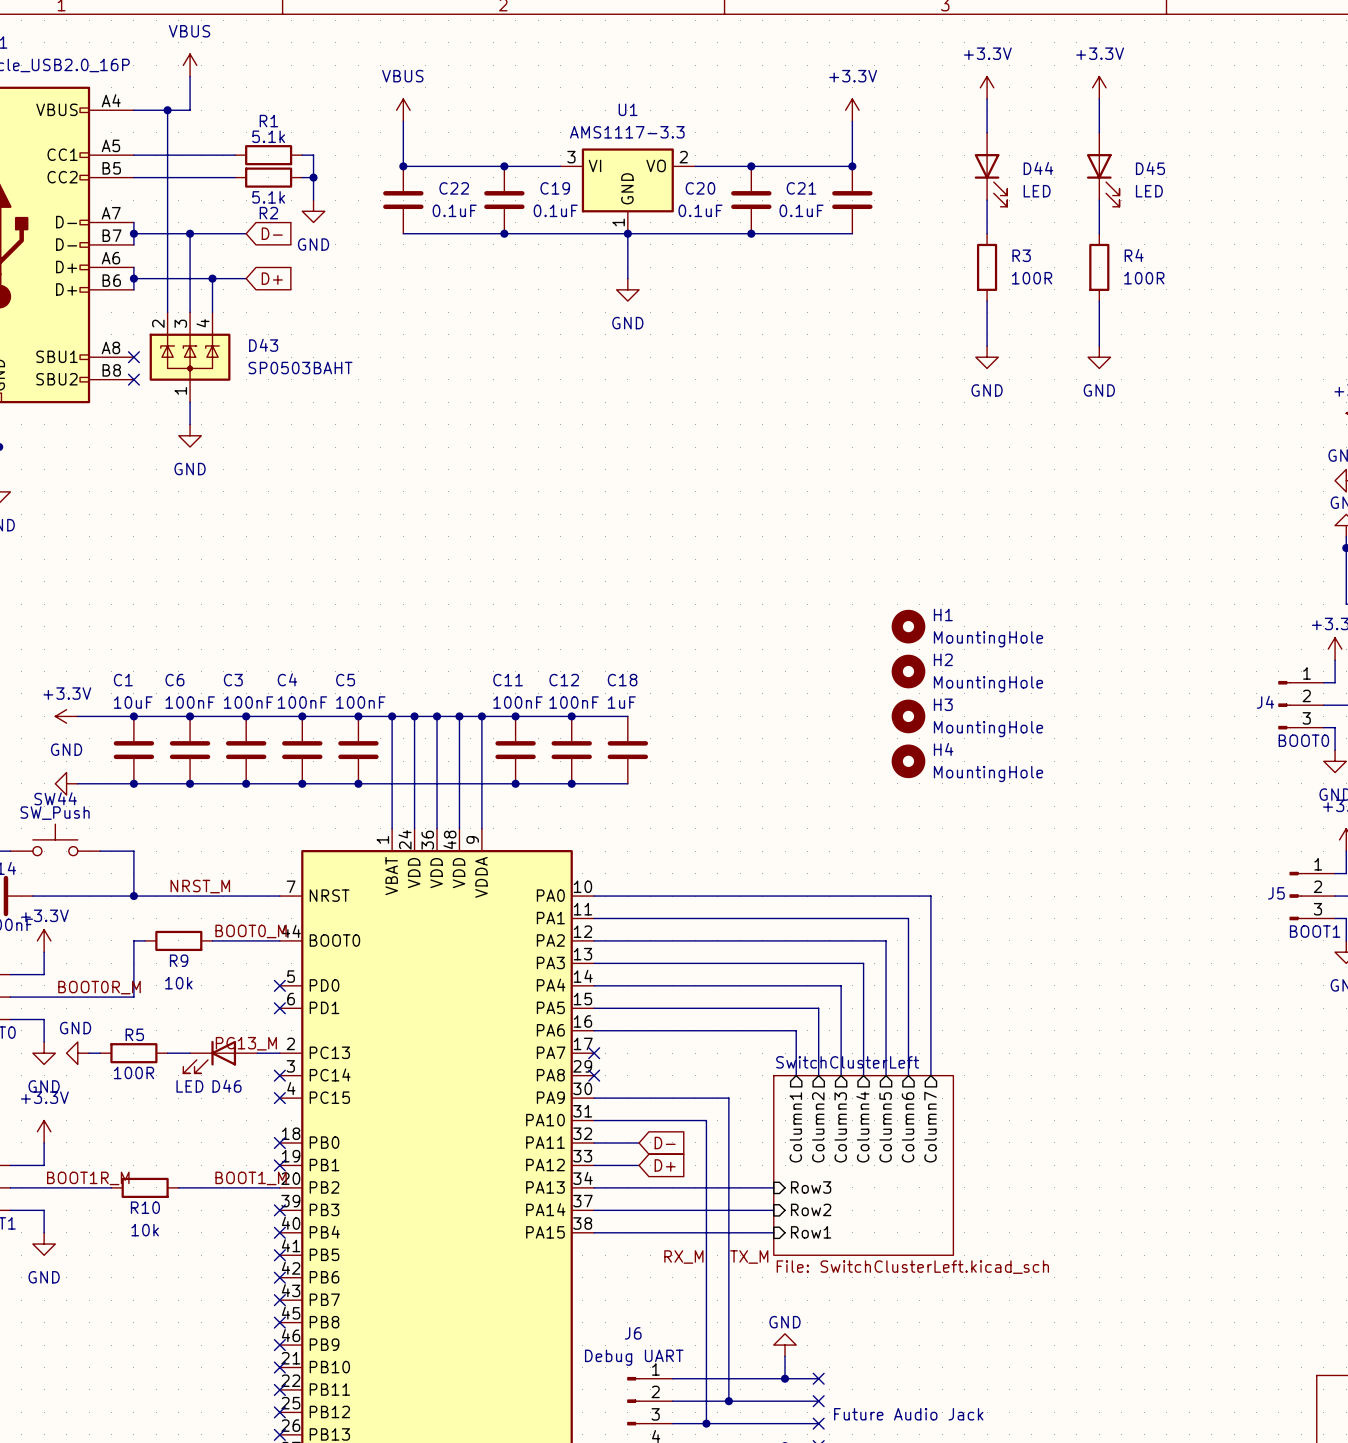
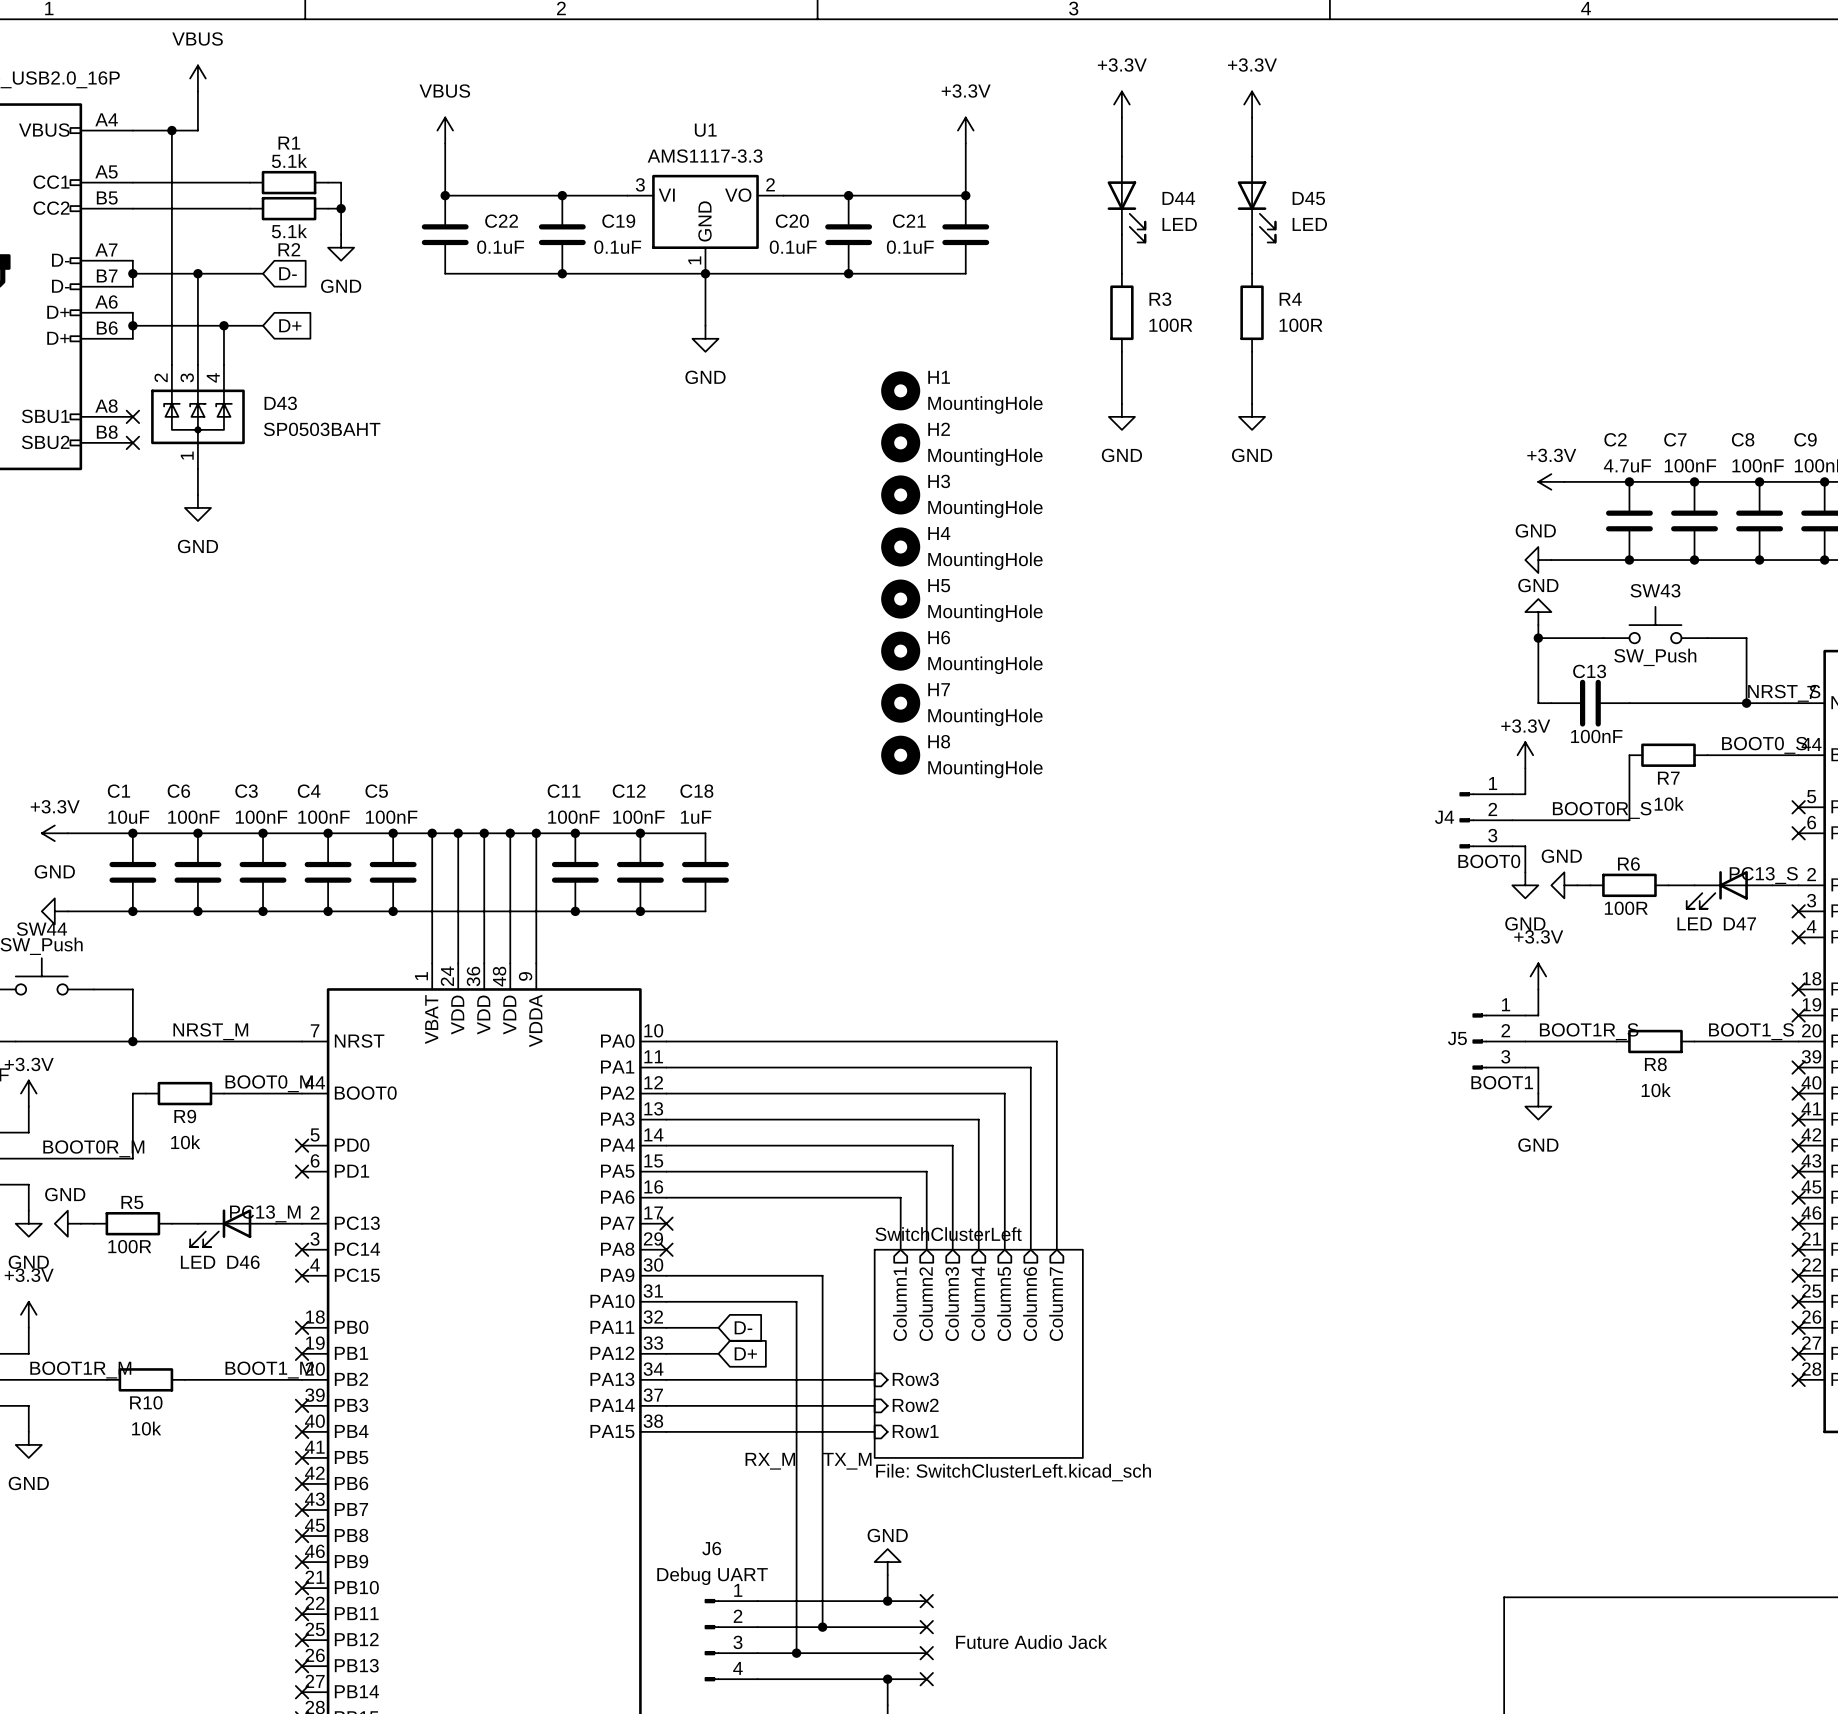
H5: none -> MountingHole (900, 599)
H6: none -> MountingHole (900, 651)
H7: none -> MountingHole (900, 703)
H1 position: (908, 626) -> (900, 390)
H8: none -> MountingHole (900, 755)
H2 position: (908, 671) -> (900, 442)
H3 position: (908, 716) -> (900, 494)
H4 position: (908, 761) -> (900, 547)

